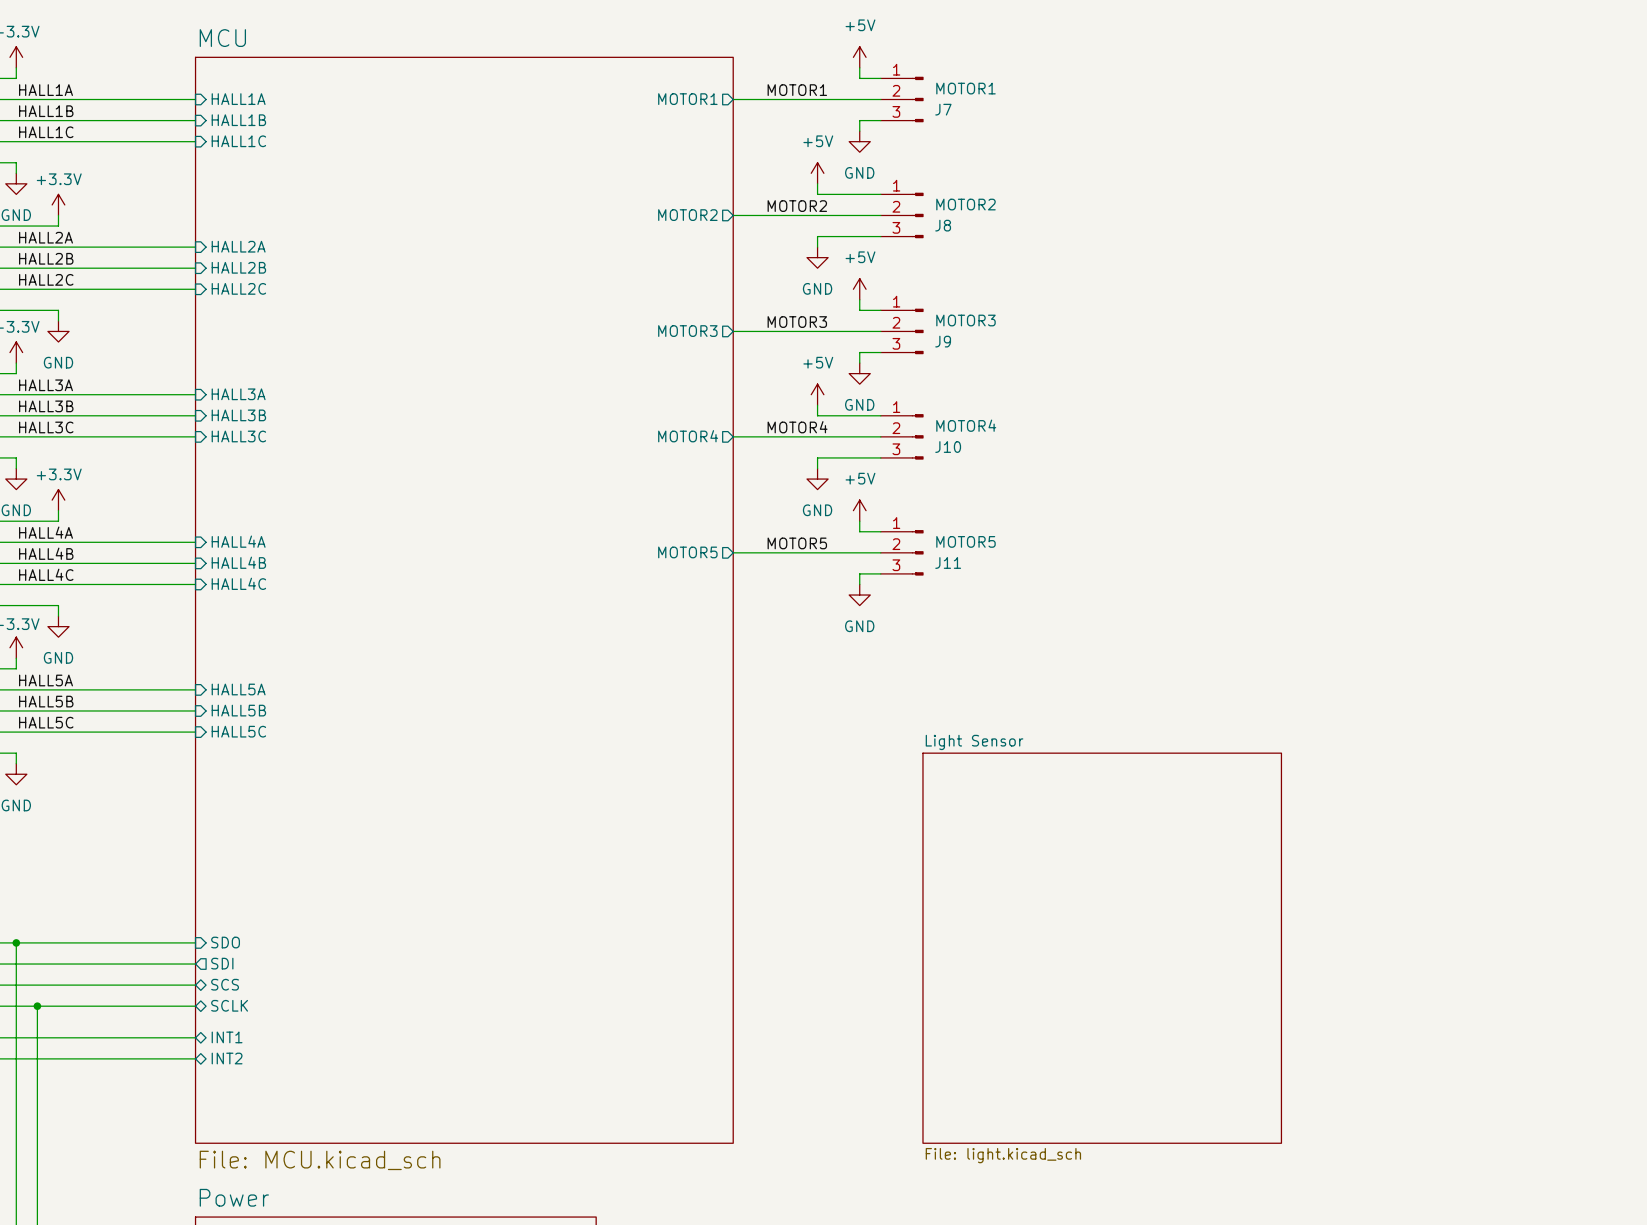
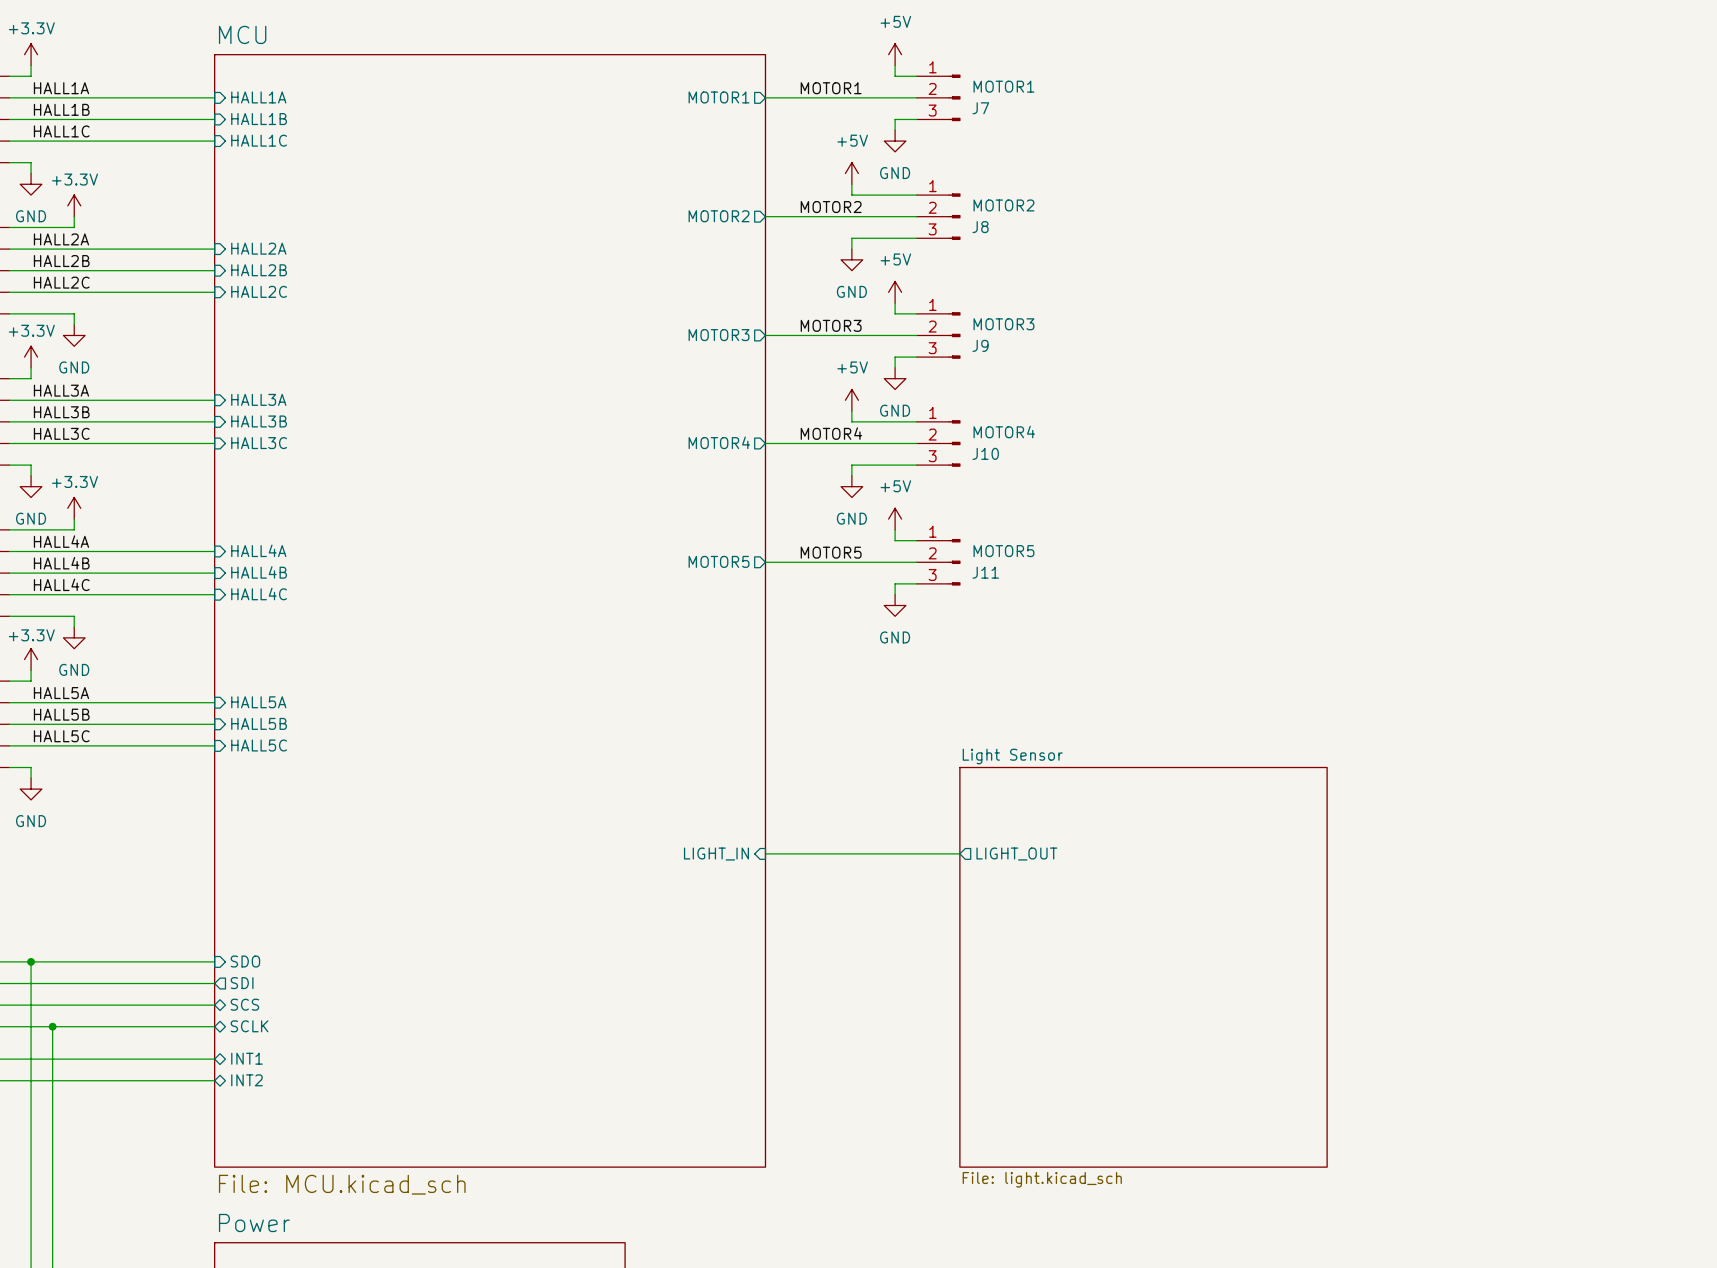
sheet pin: none -> LIGHT_IN (716, 854)
wire: none -> (765, 853) (959, 853)
sheet pin: none -> LIGHT_OUT (1016, 854)

